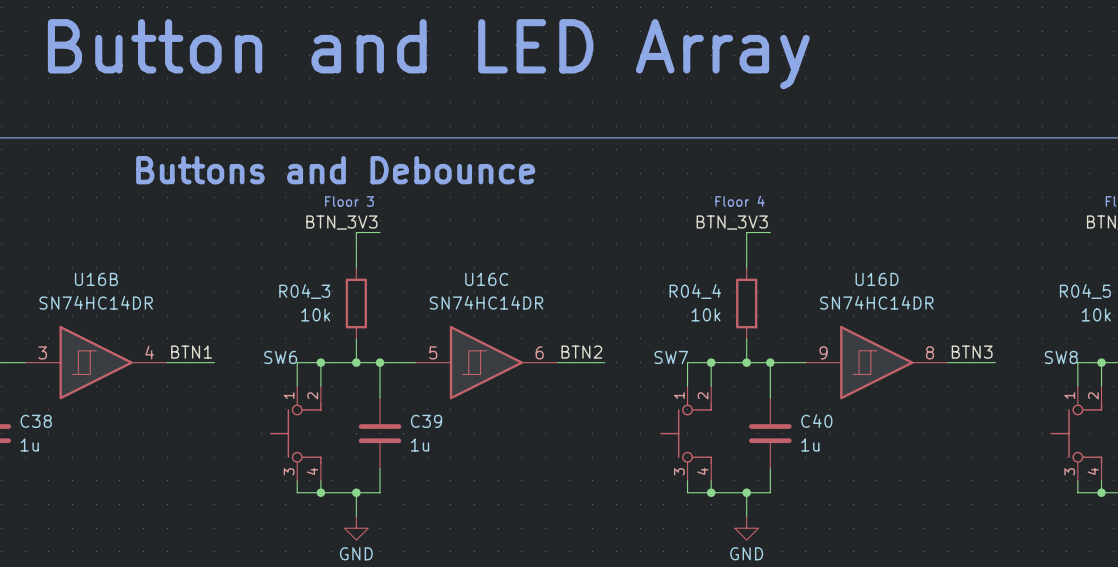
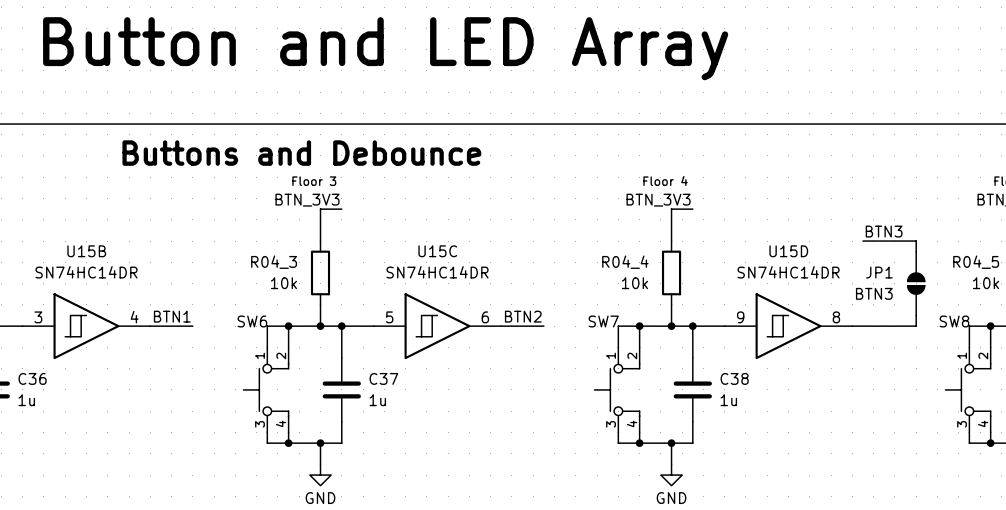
wire: none -> (863, 241) (916, 241) (916, 251)
U16B name: U16B (96, 279) -> U15B (86, 251)
U16C name: U16C (486, 279) -> U15C (437, 251)
U16D name: U16D (877, 279) -> U15D (788, 251)
JP1: none -> BTN3 (916, 283)
wire: none -> (916, 315) (916, 326) (894, 326)
label position: BTN3 (972, 352) -> BTN3 (884, 231)
C38 name: C38 (36, 421) -> C36 (32, 378)
C39 name: C39 (426, 421) -> C37 (383, 378)
C40 name: C40 (816, 421) -> C38 (734, 378)

